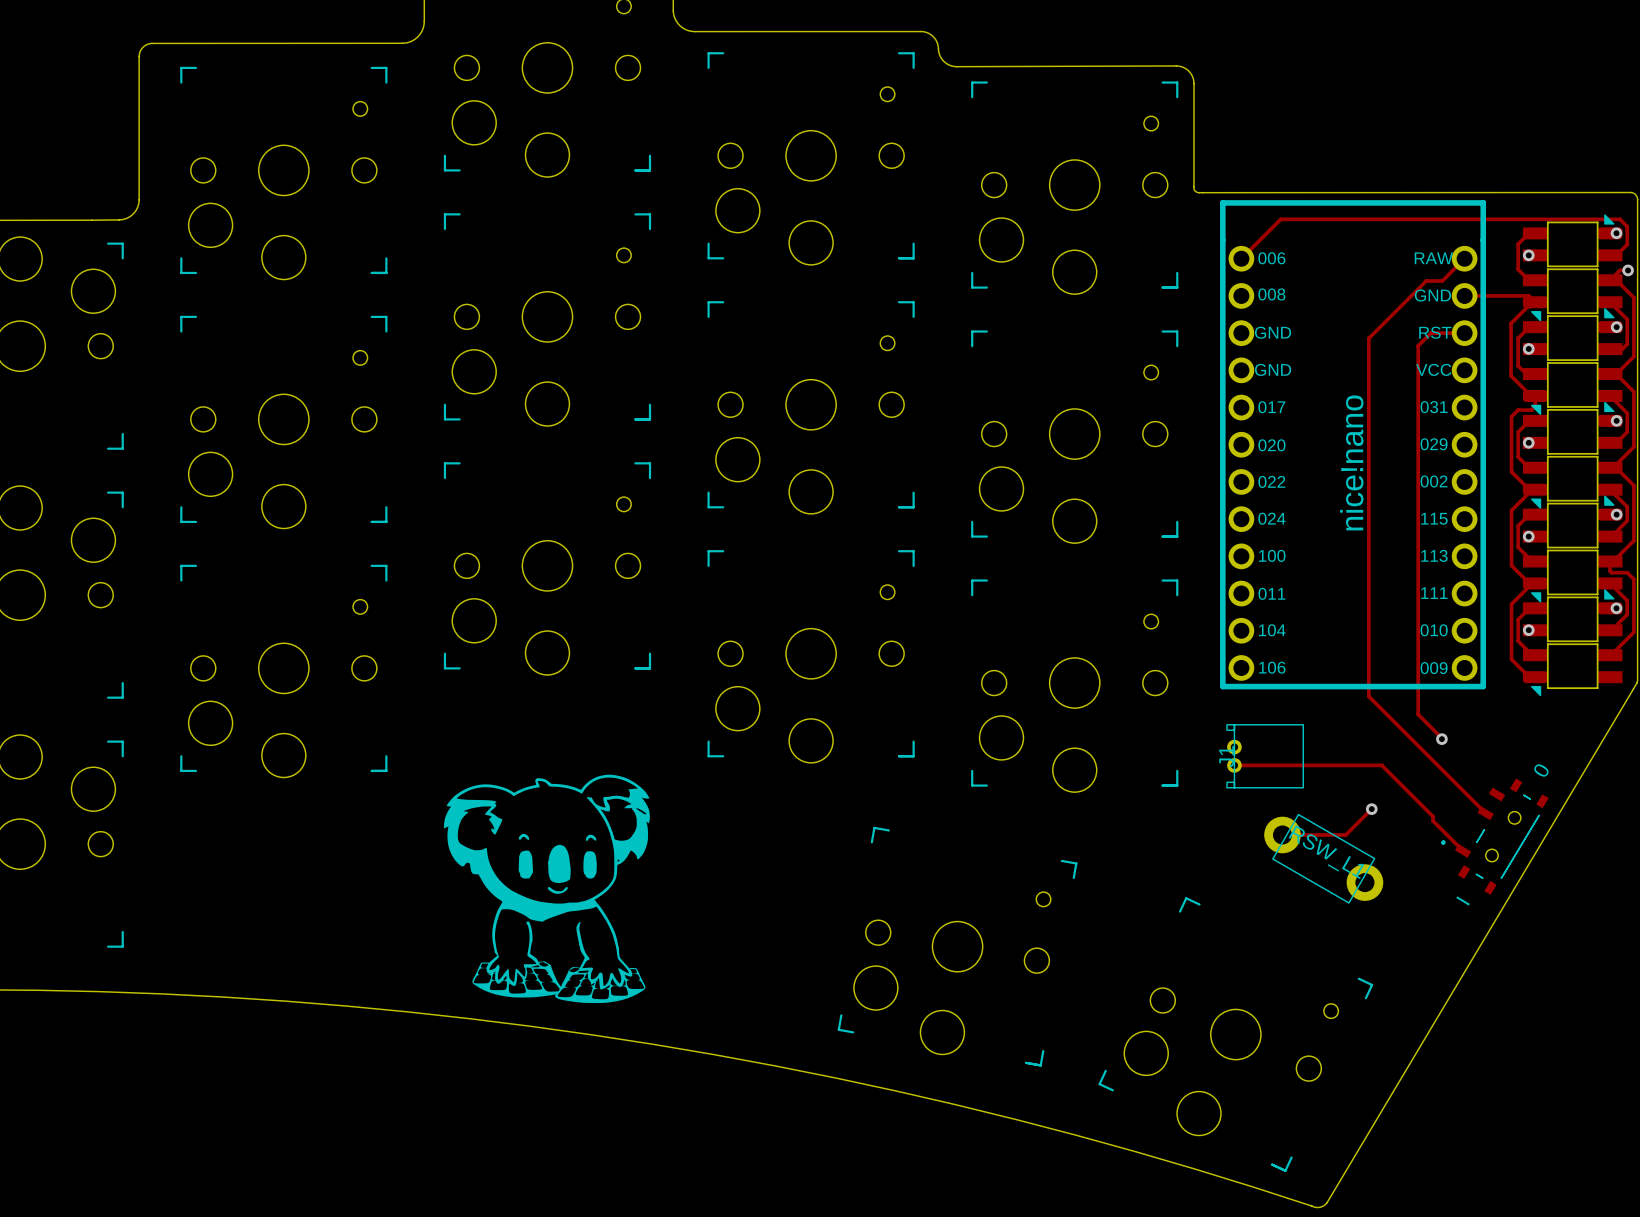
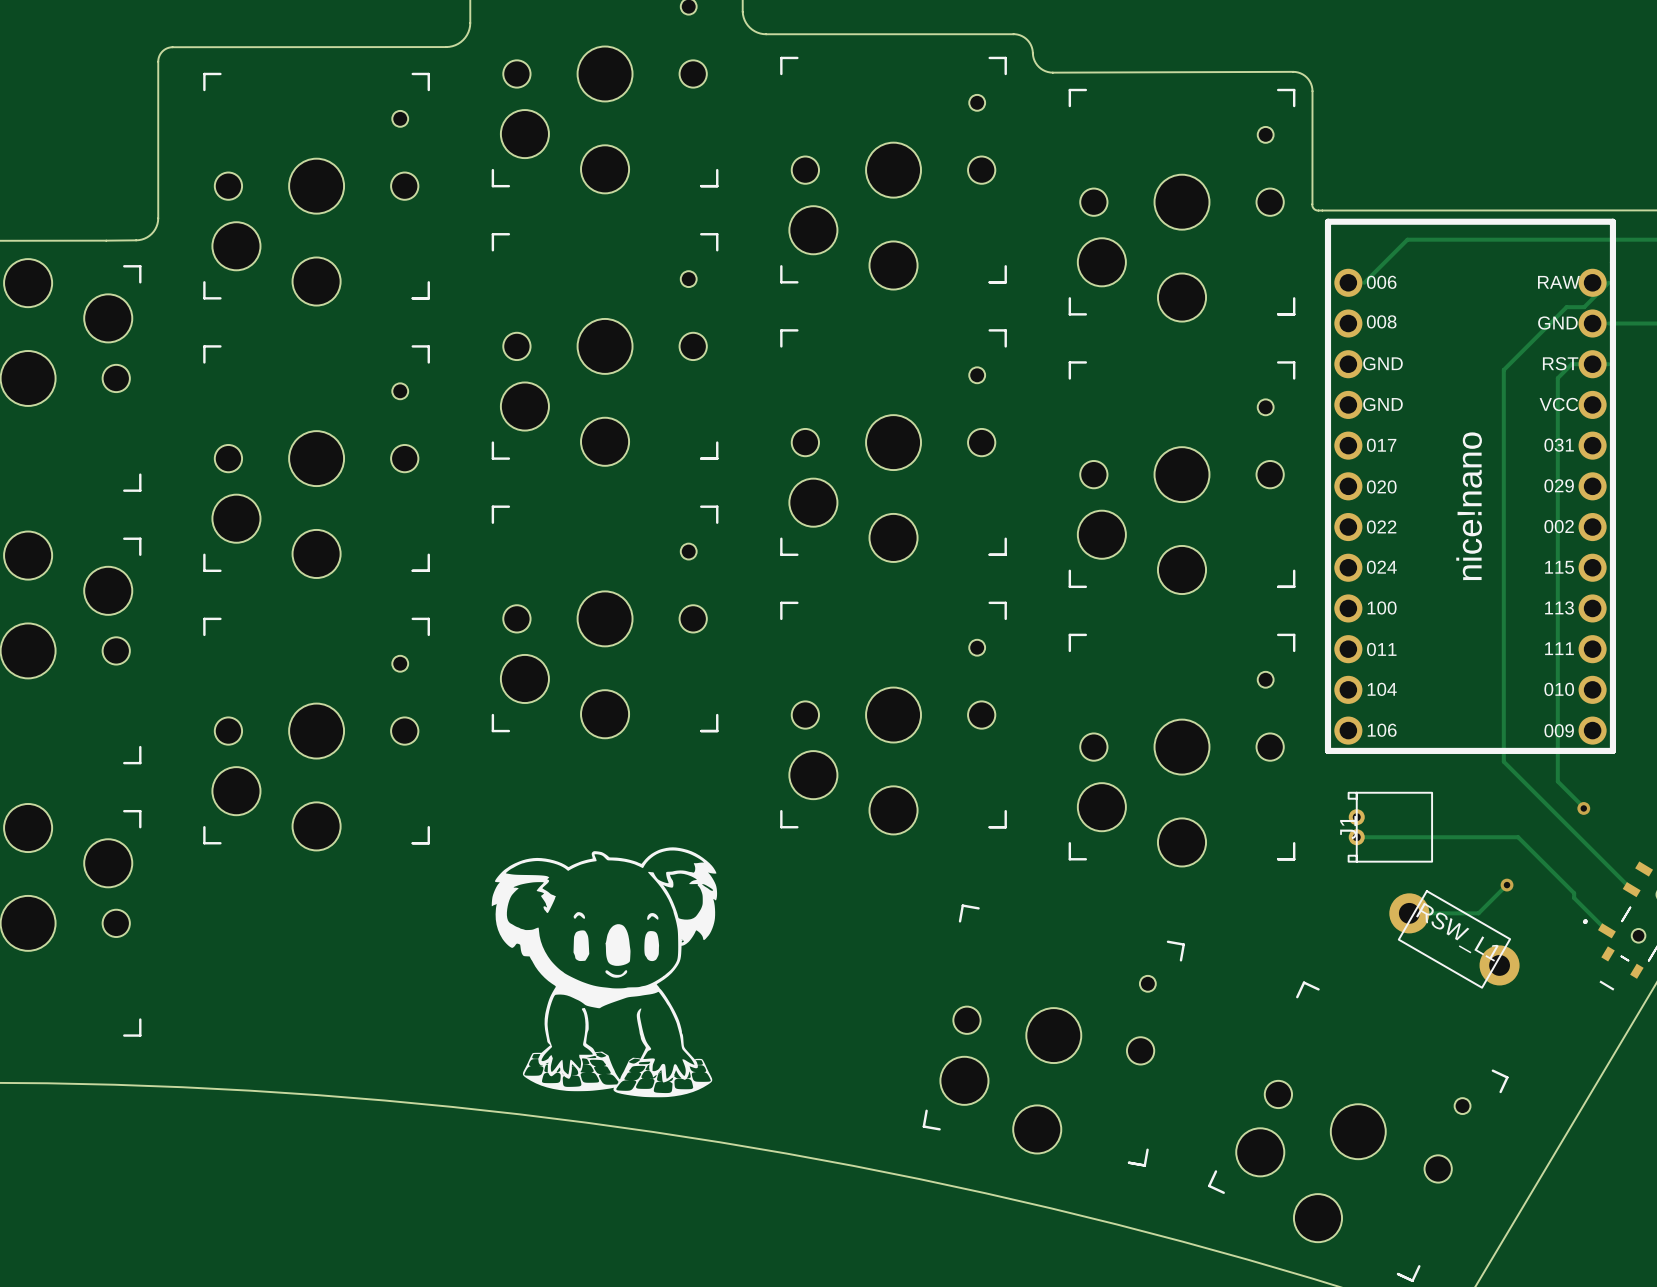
part position: (1353, 444) -> (1470, 486)

